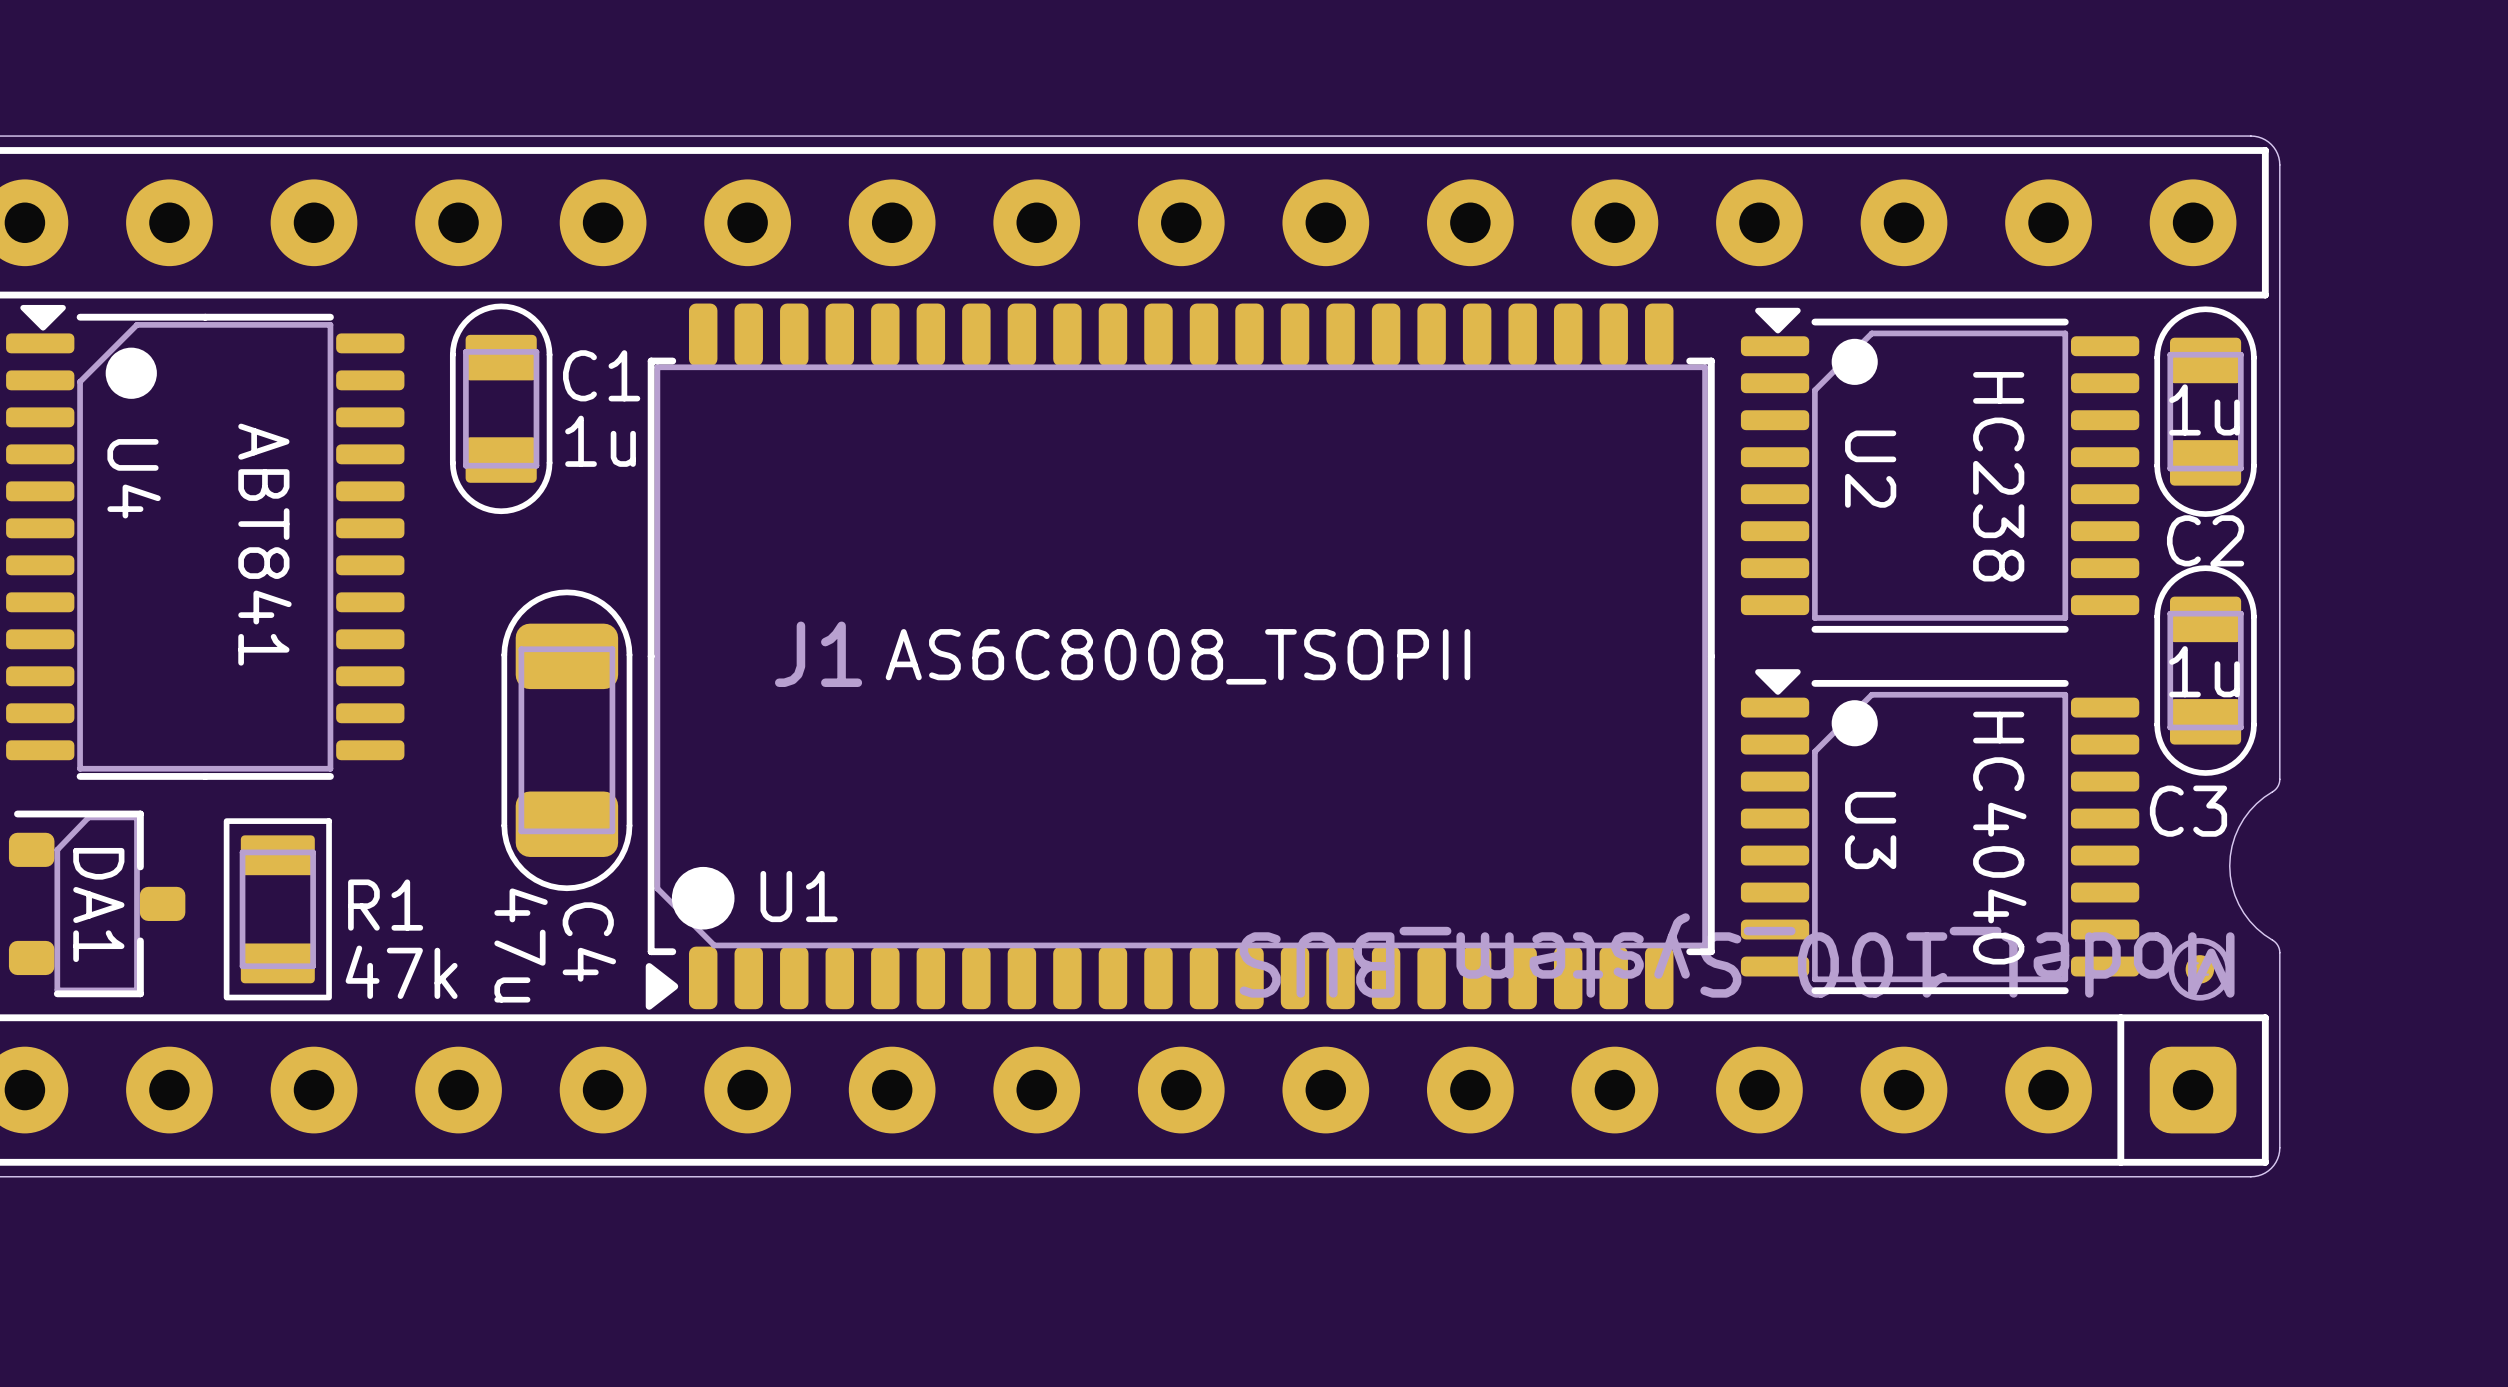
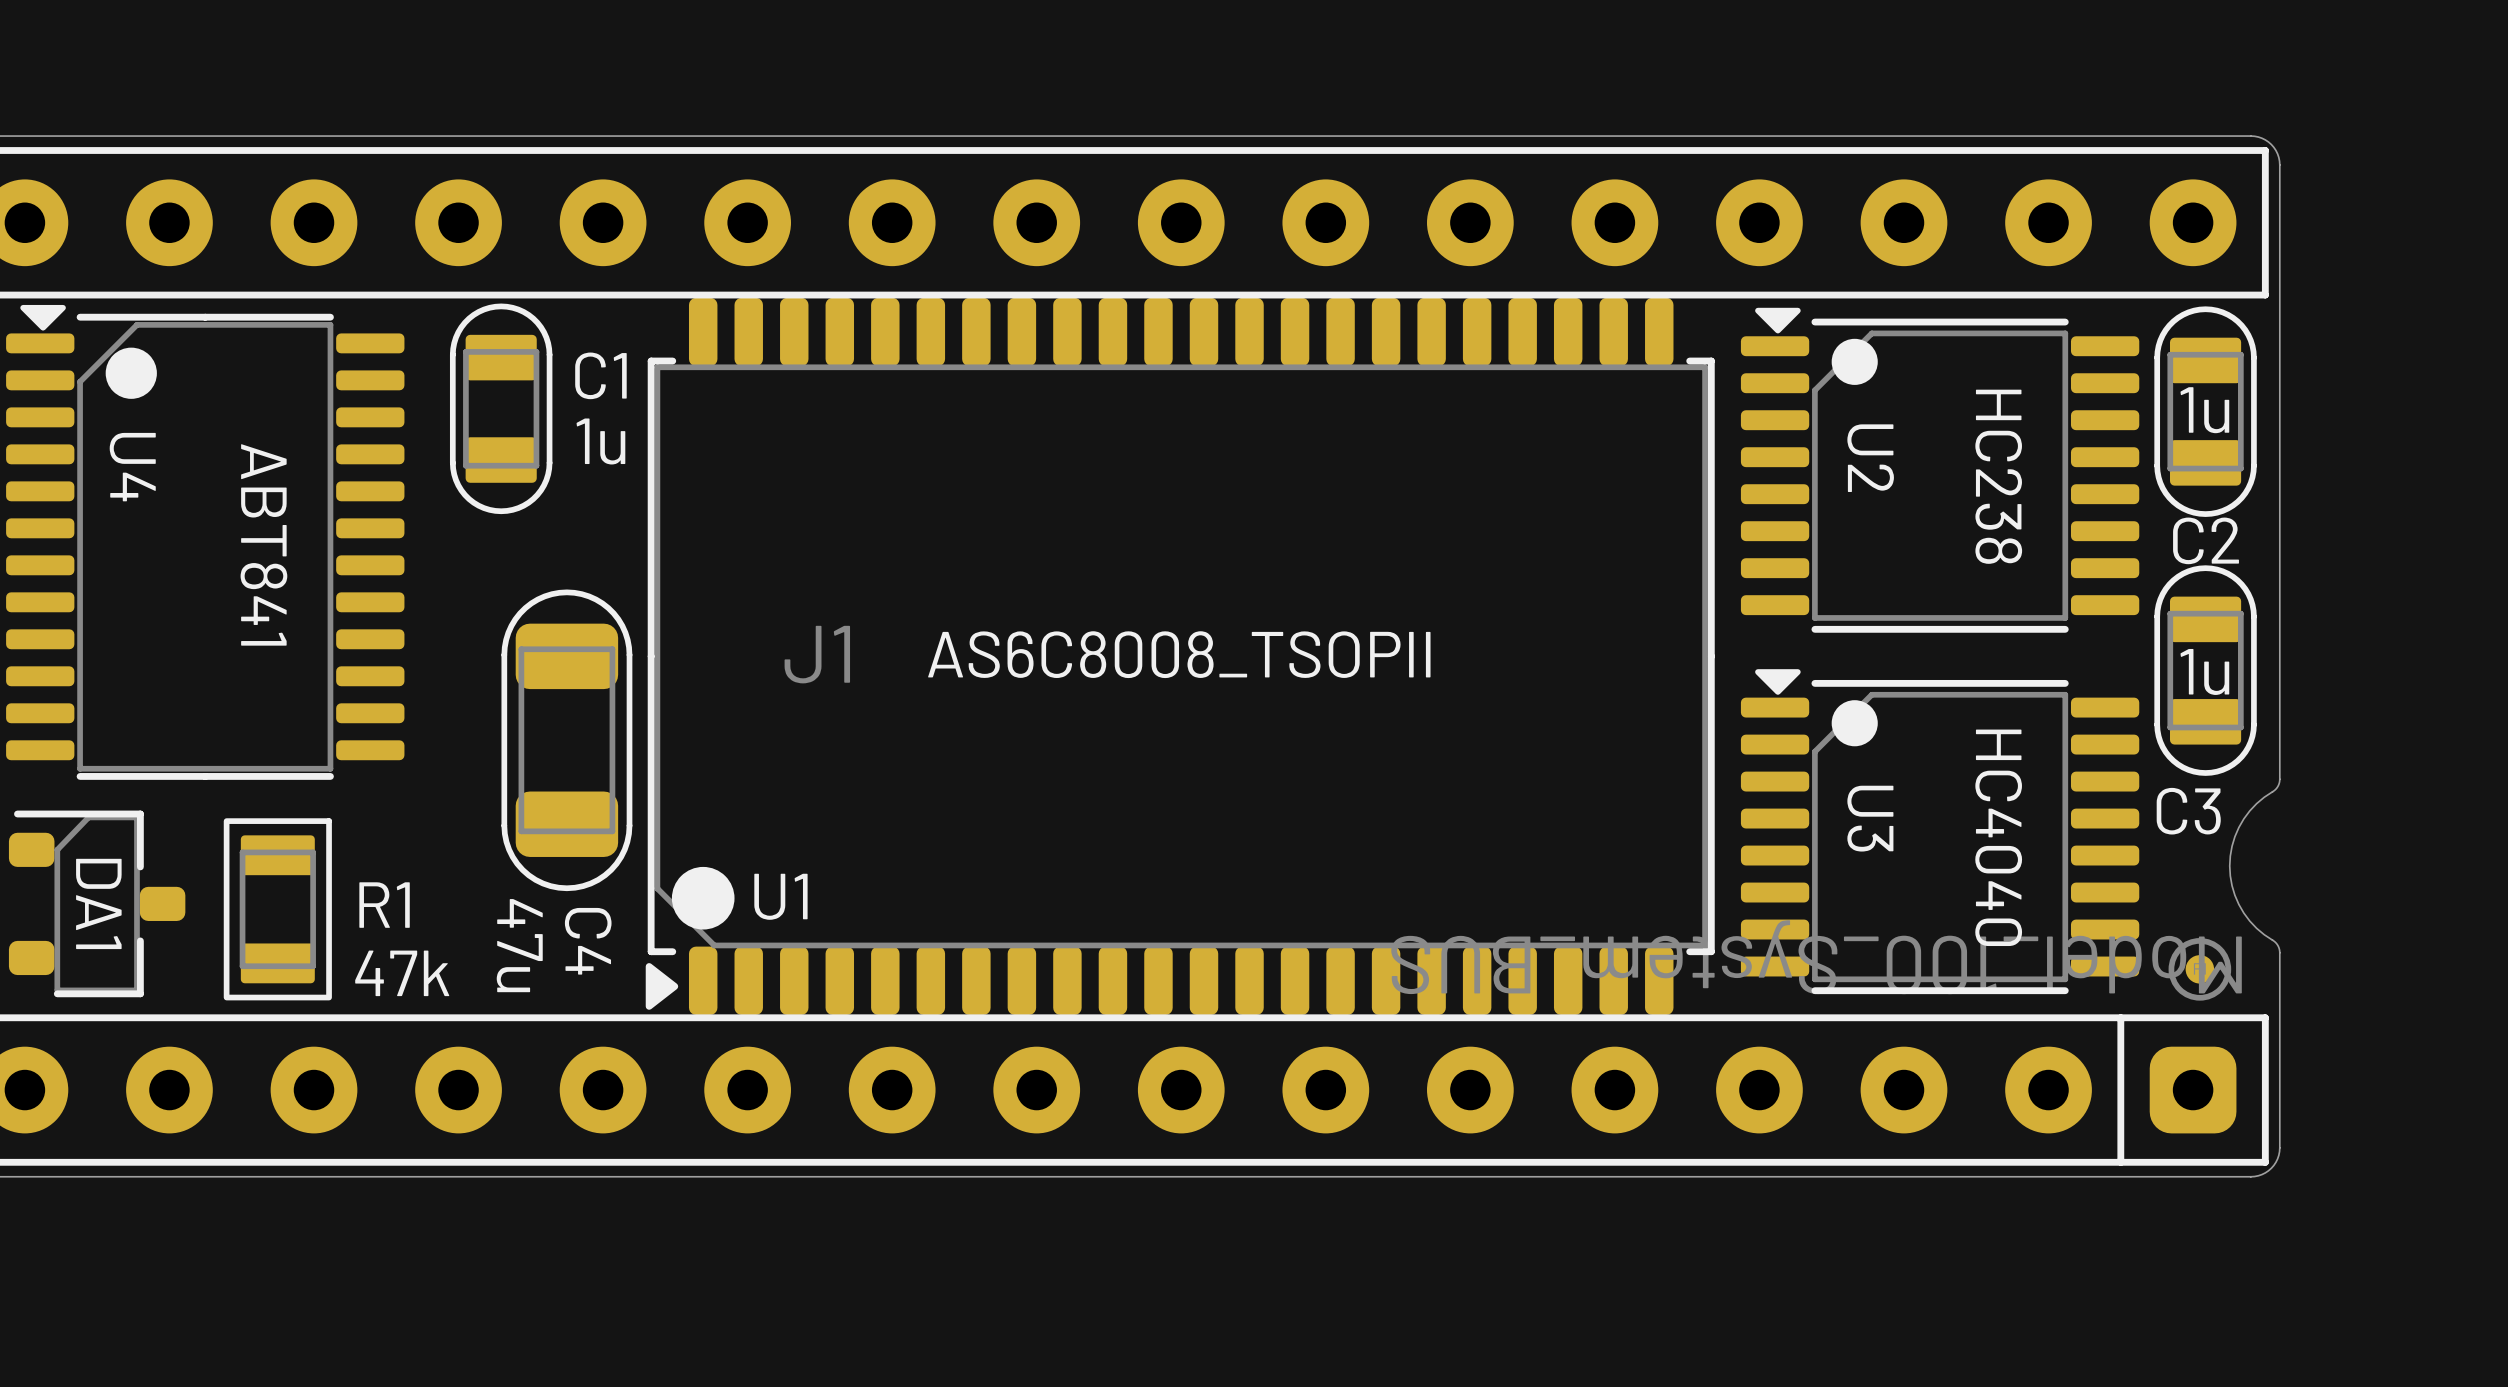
U1 footprint: [645, 303, 1715, 1010] -> [645, 297, 1715, 1015]

